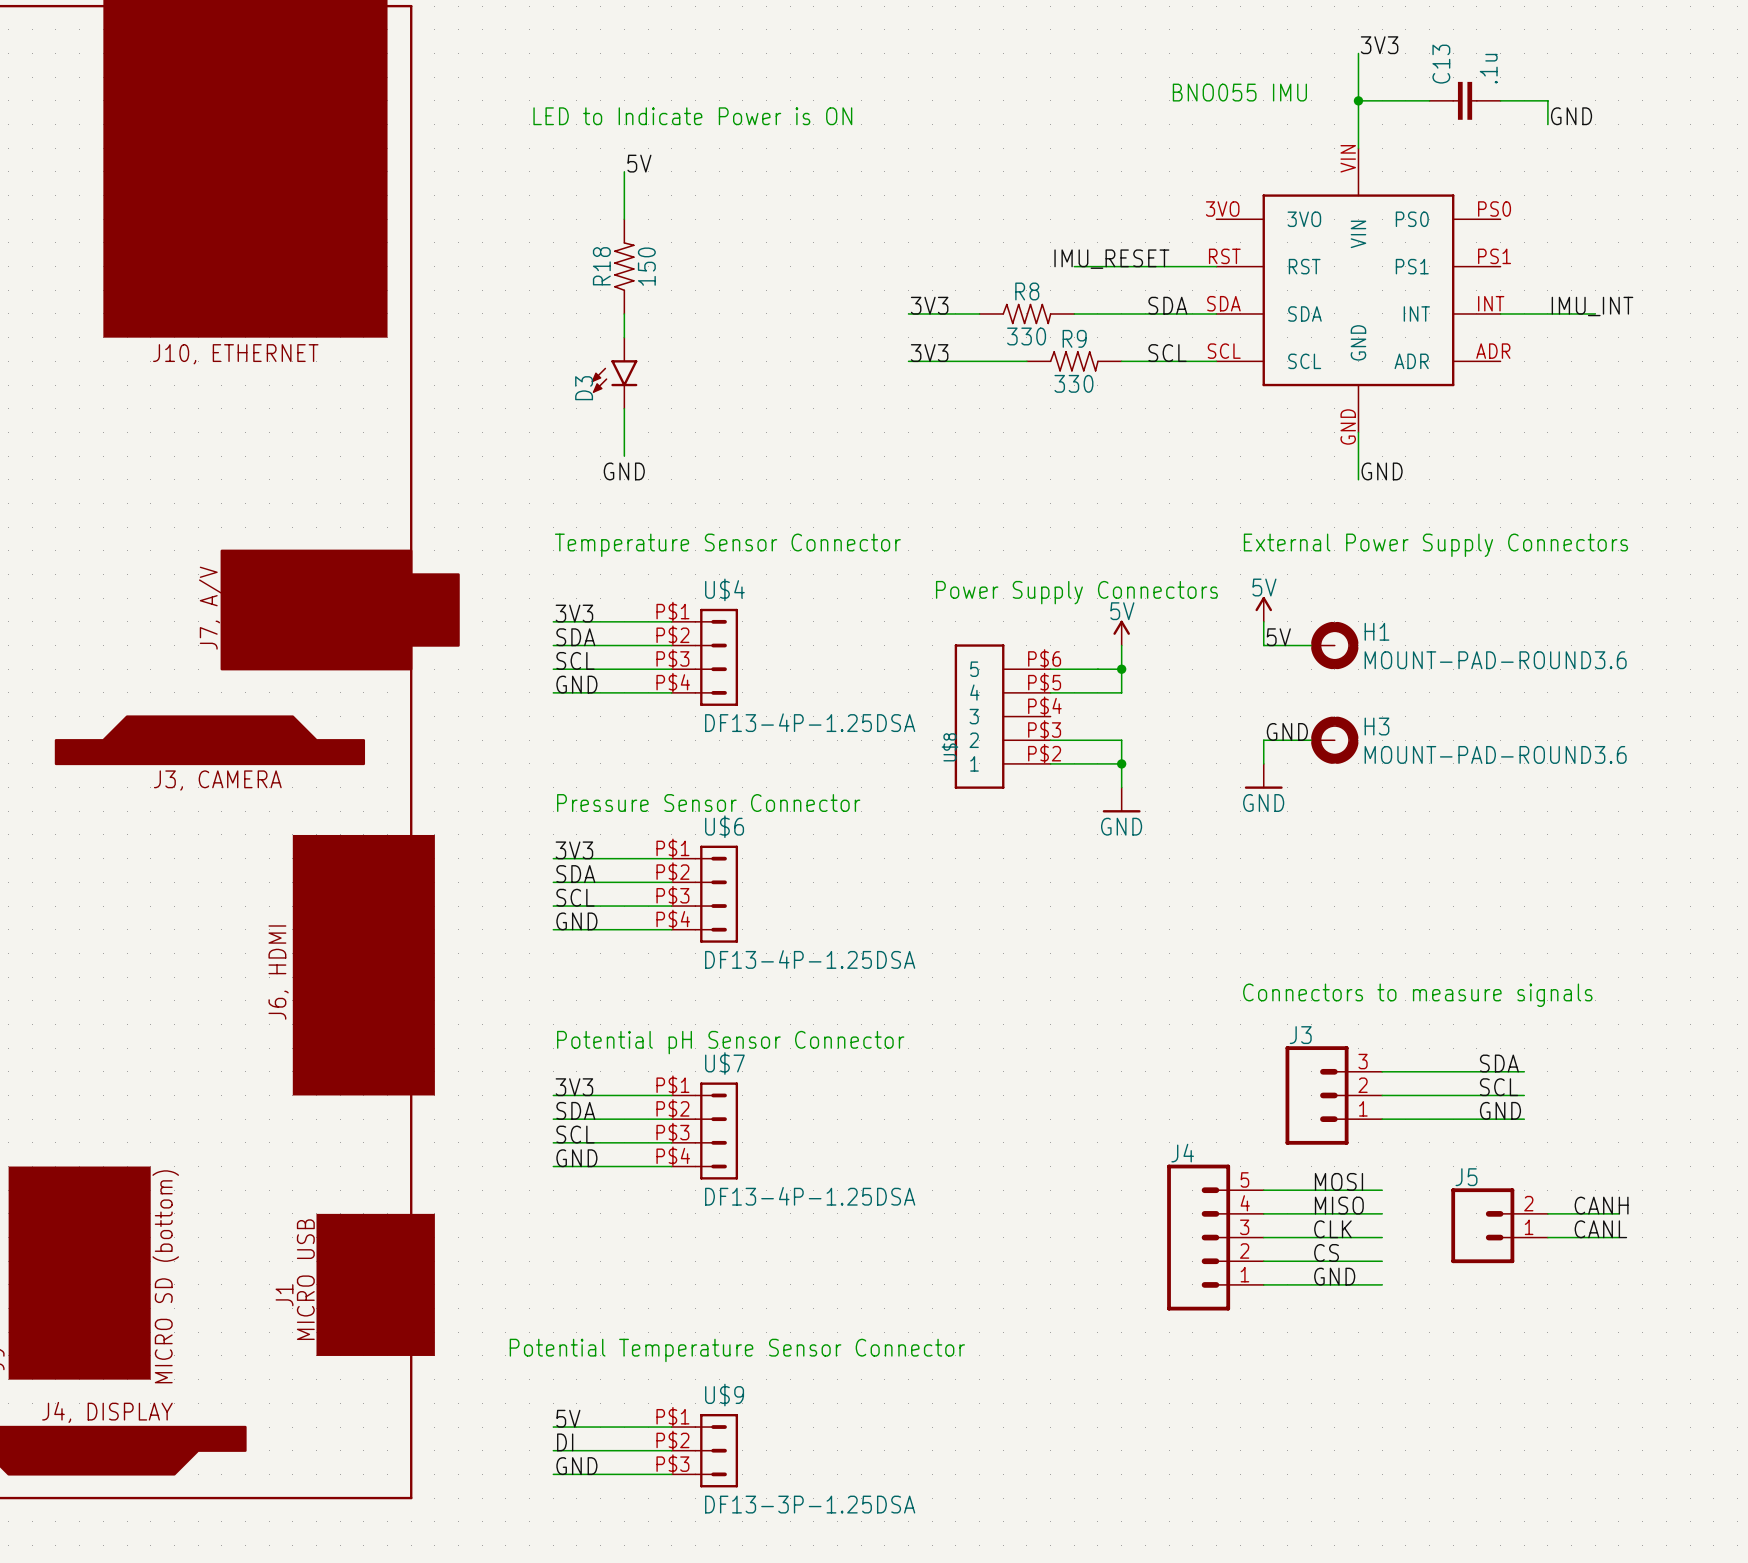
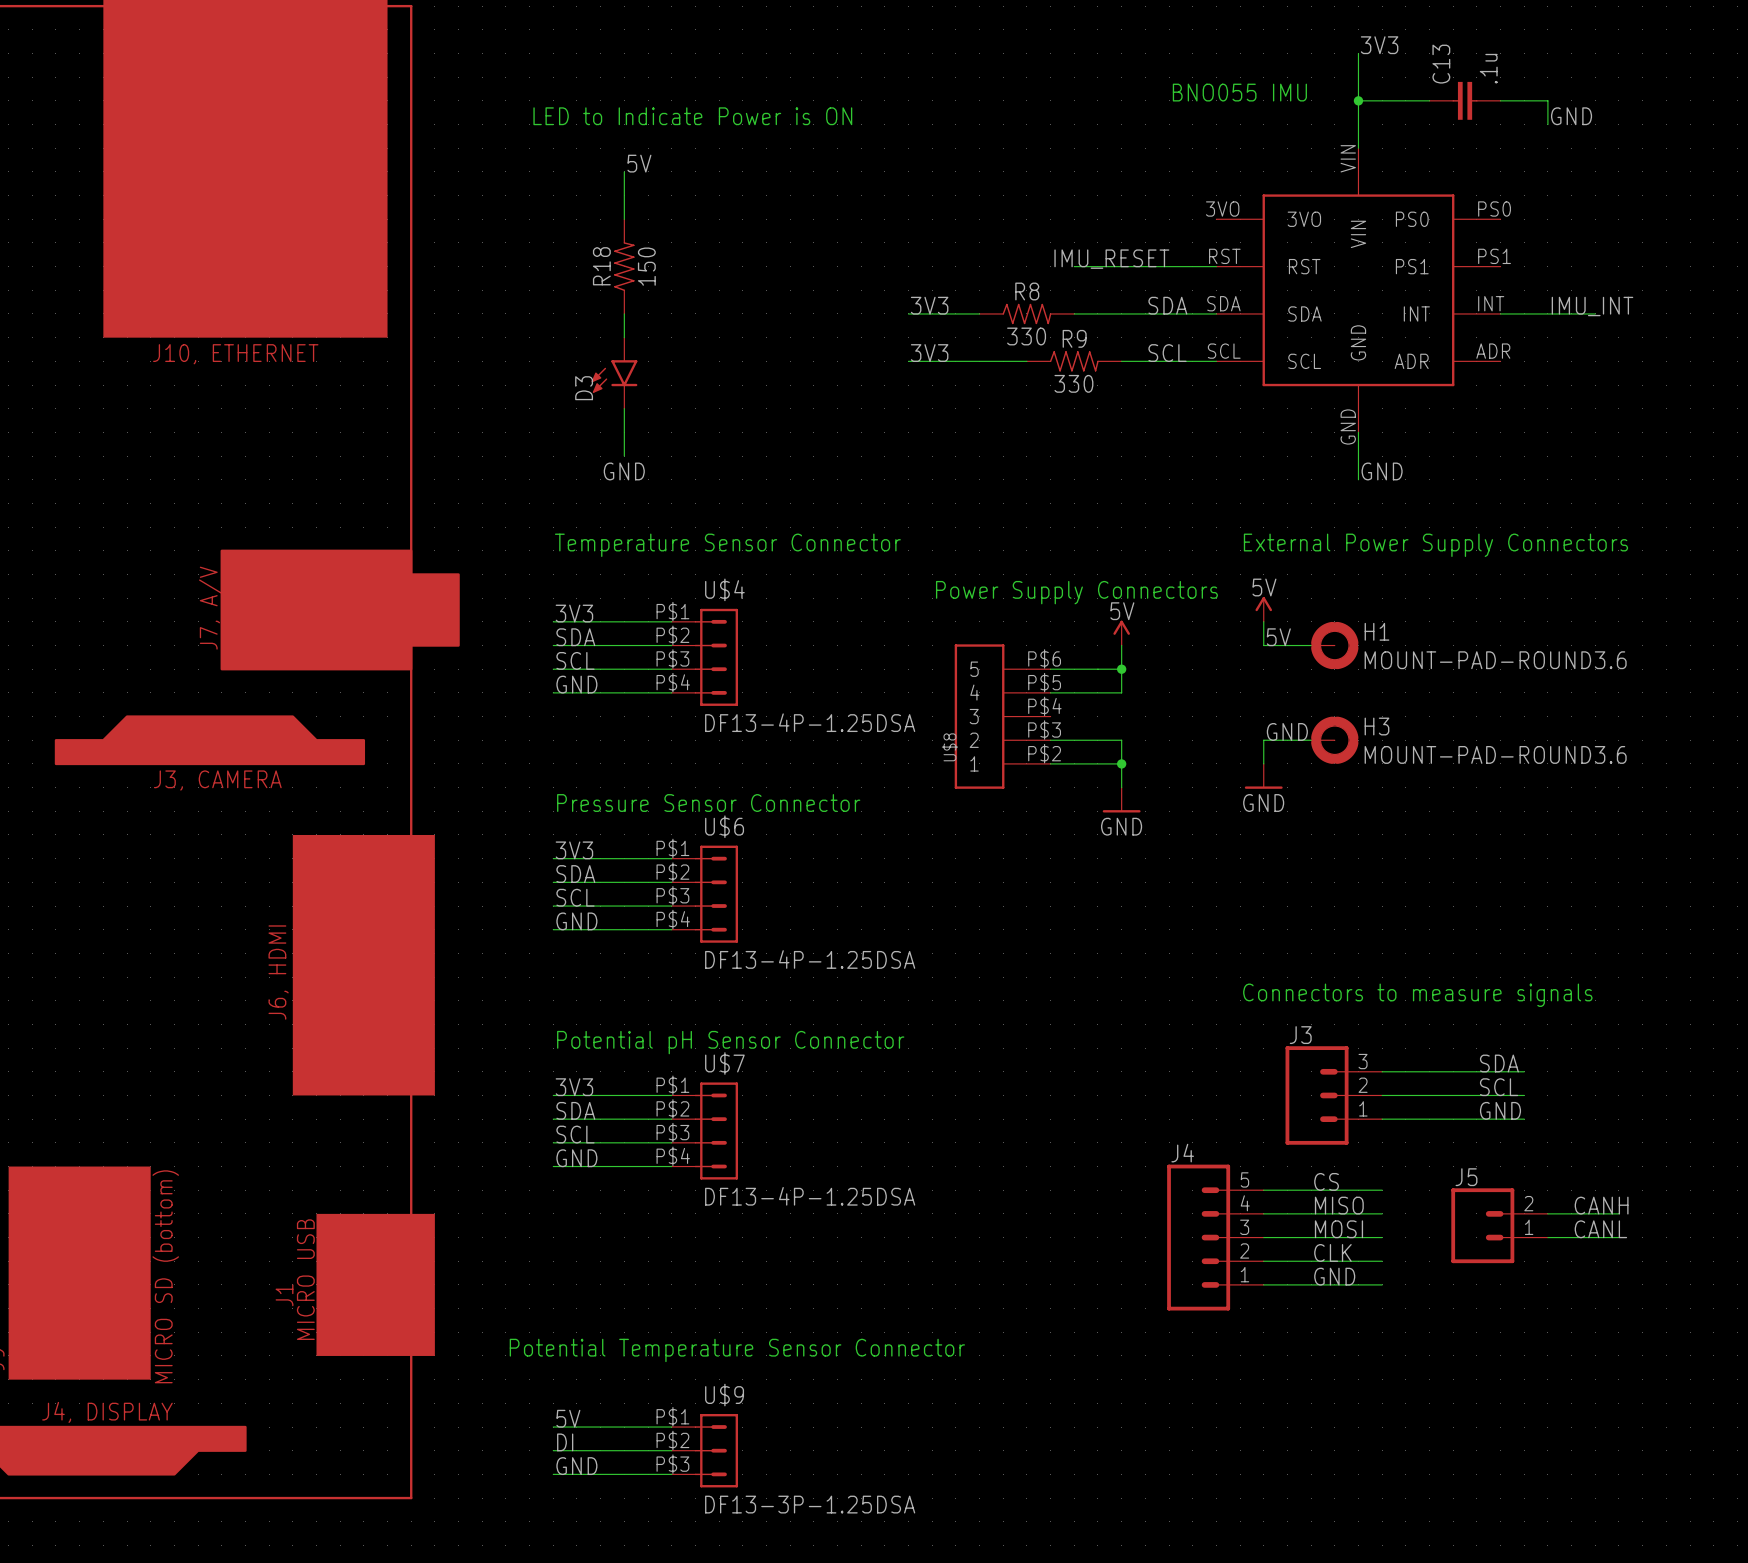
label: MOSI (1338, 1181) -> CS (1326, 1181)
label: CLK (1332, 1229) -> MOSI (1338, 1229)
label: CS (1326, 1252) -> CLK (1332, 1252)

